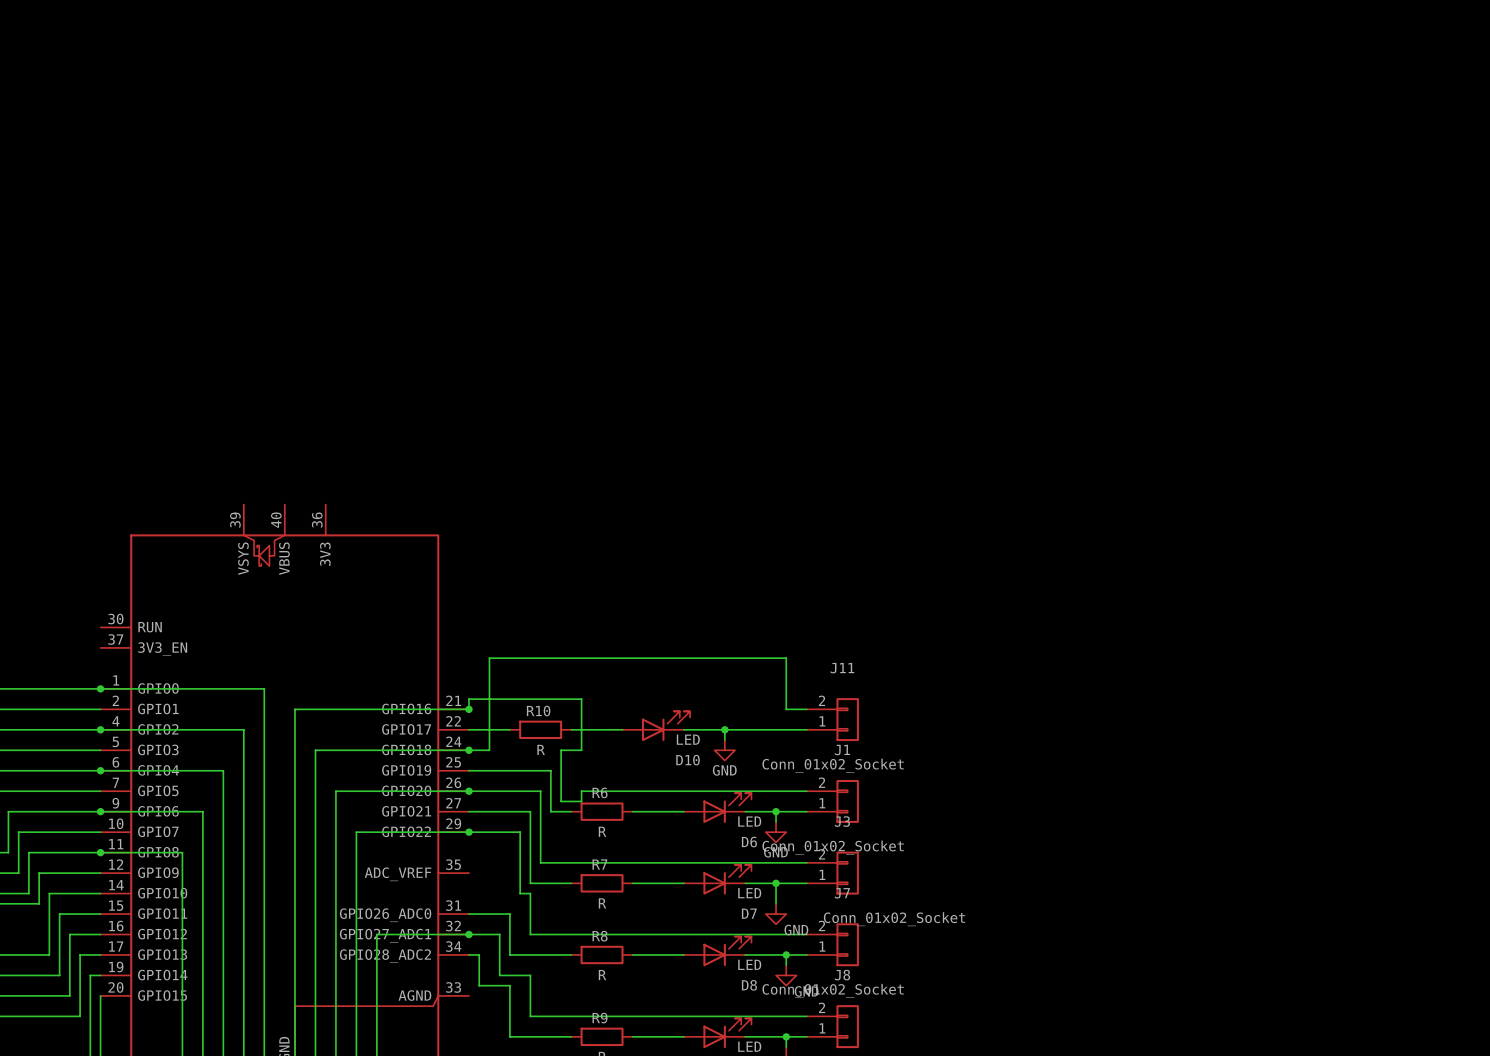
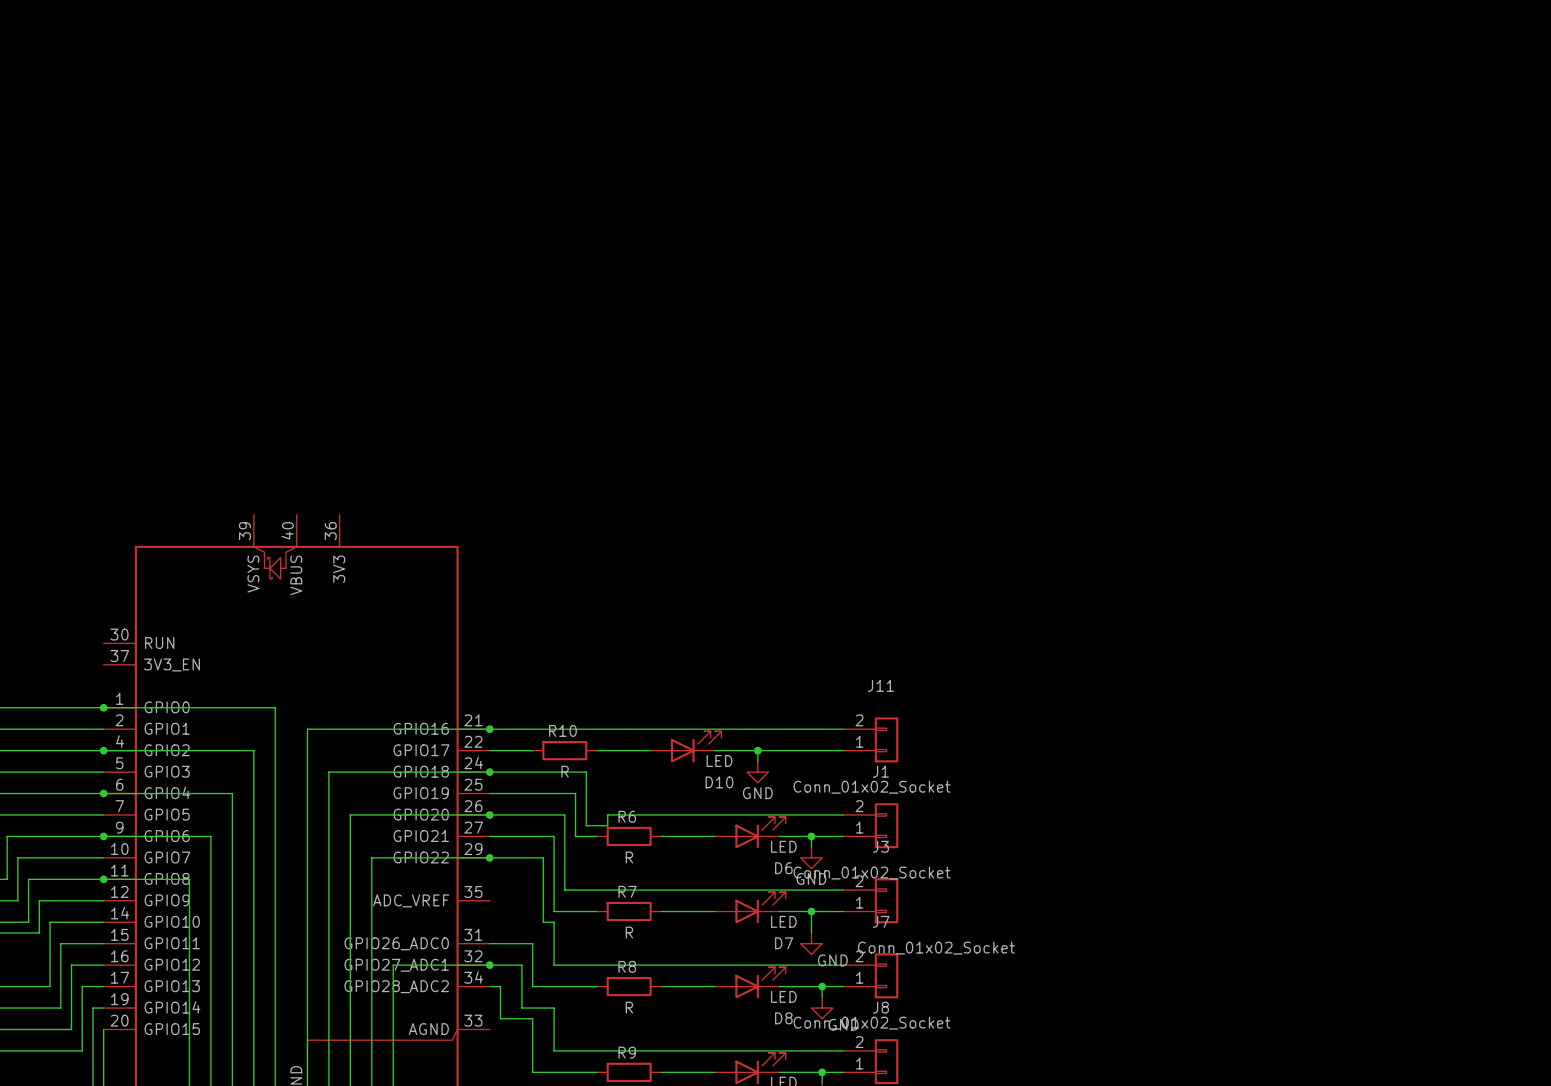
wire: (468, 709) (468, 699) (581, 699) (581, 750) (561, 750) -> (511, 772) (586, 772)
wire: (786, 709) (786, 658) (489, 658) (489, 750) -> (822, 729) (489, 729)

